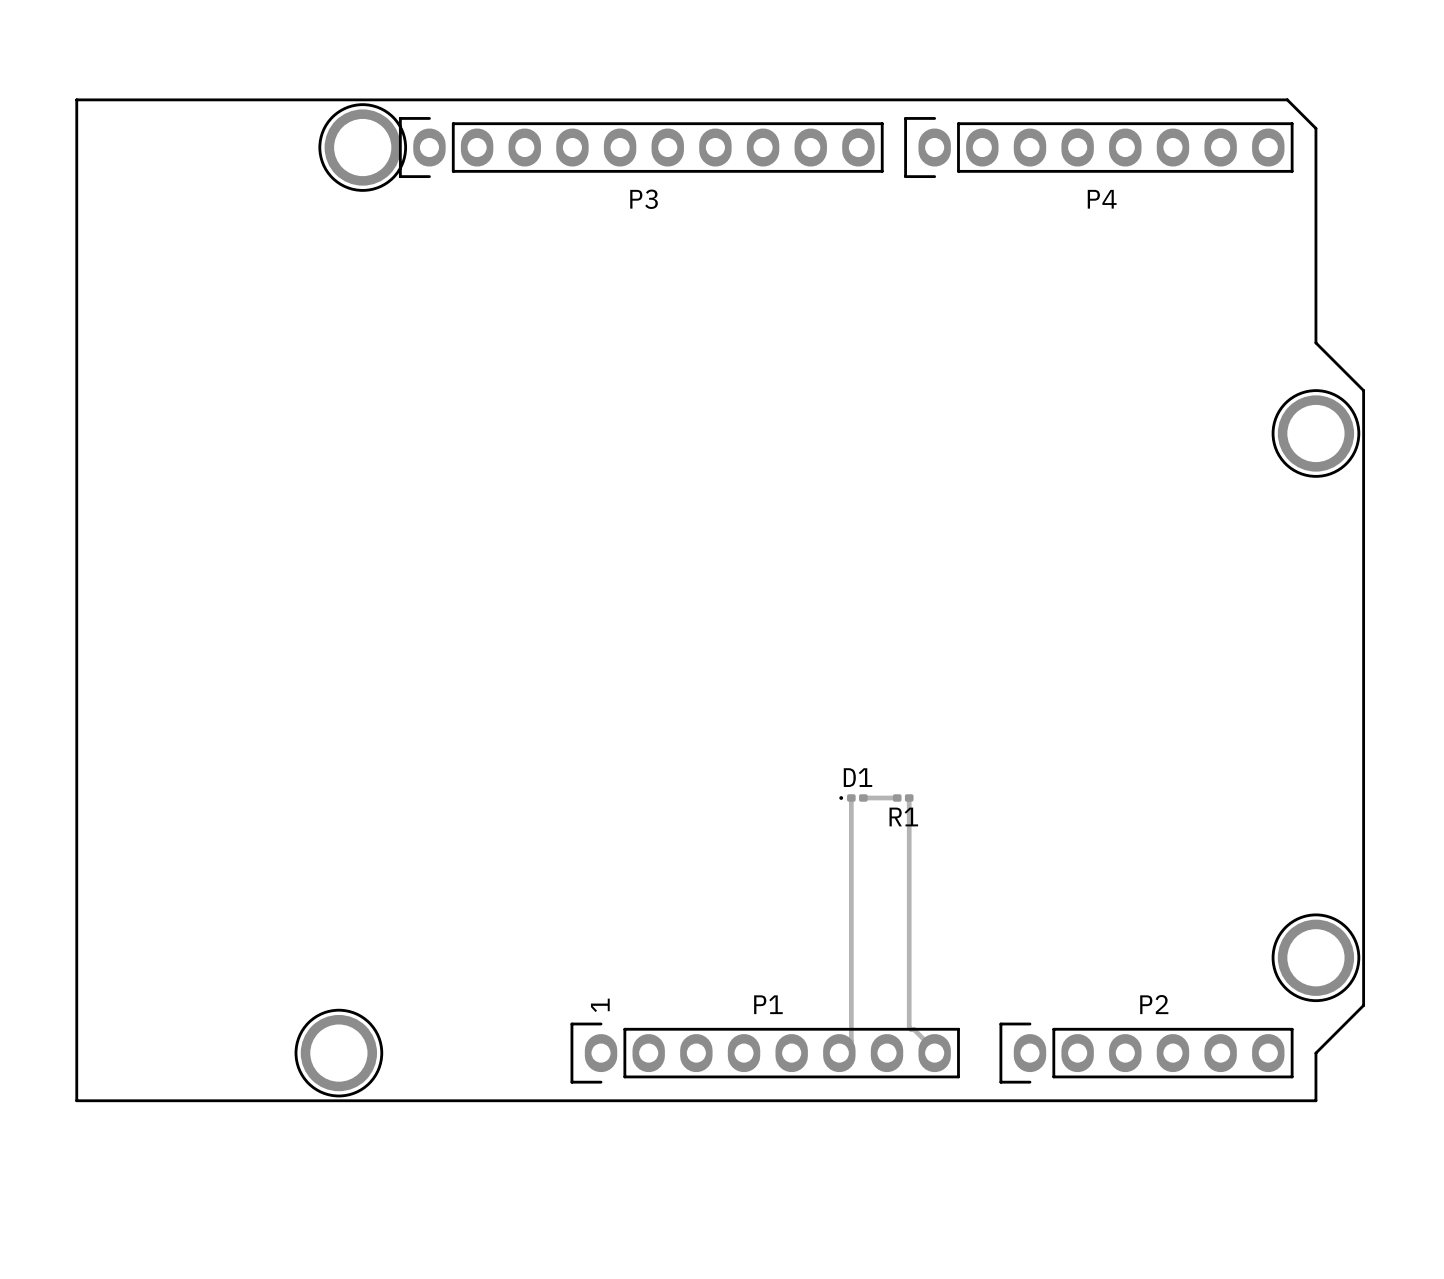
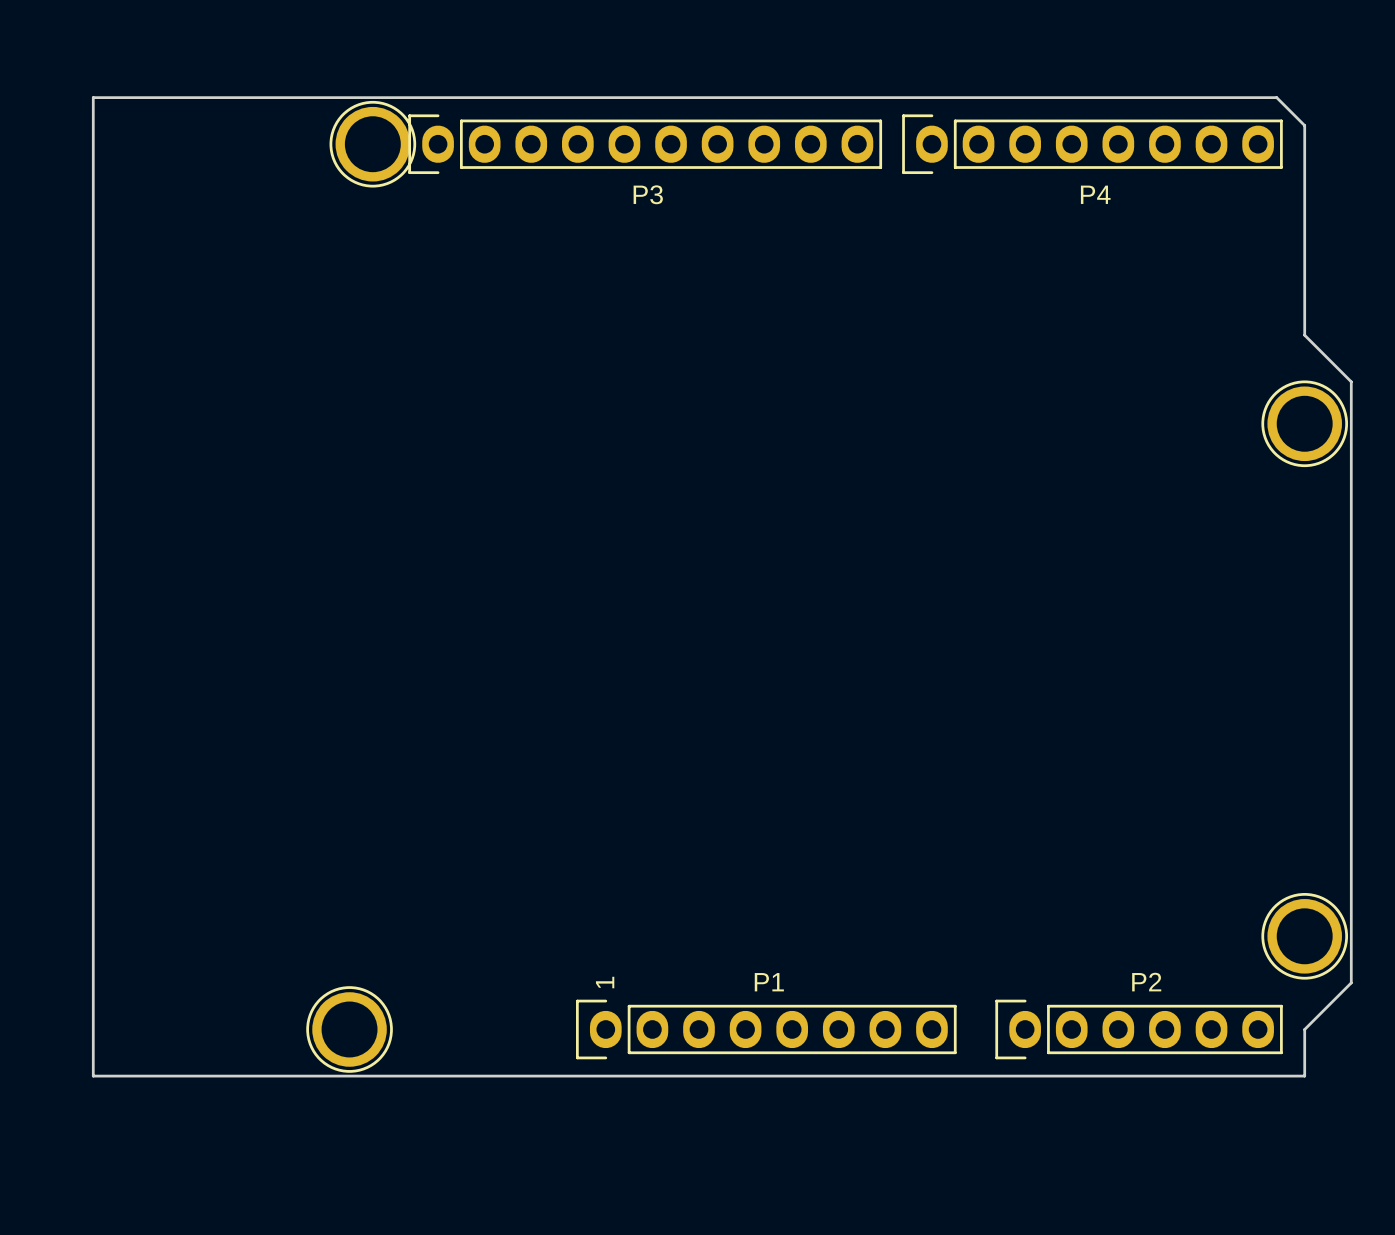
track: (851, 797) (851, 1041) (839, 1053) -> none
D1: (853, 797) -> none
track: (863, 797) (897, 797) -> none
R1: (903, 797) -> none
track: (909, 797) (909, 1027) (913, 1029) (934, 1050) (934, 1053) -> none

